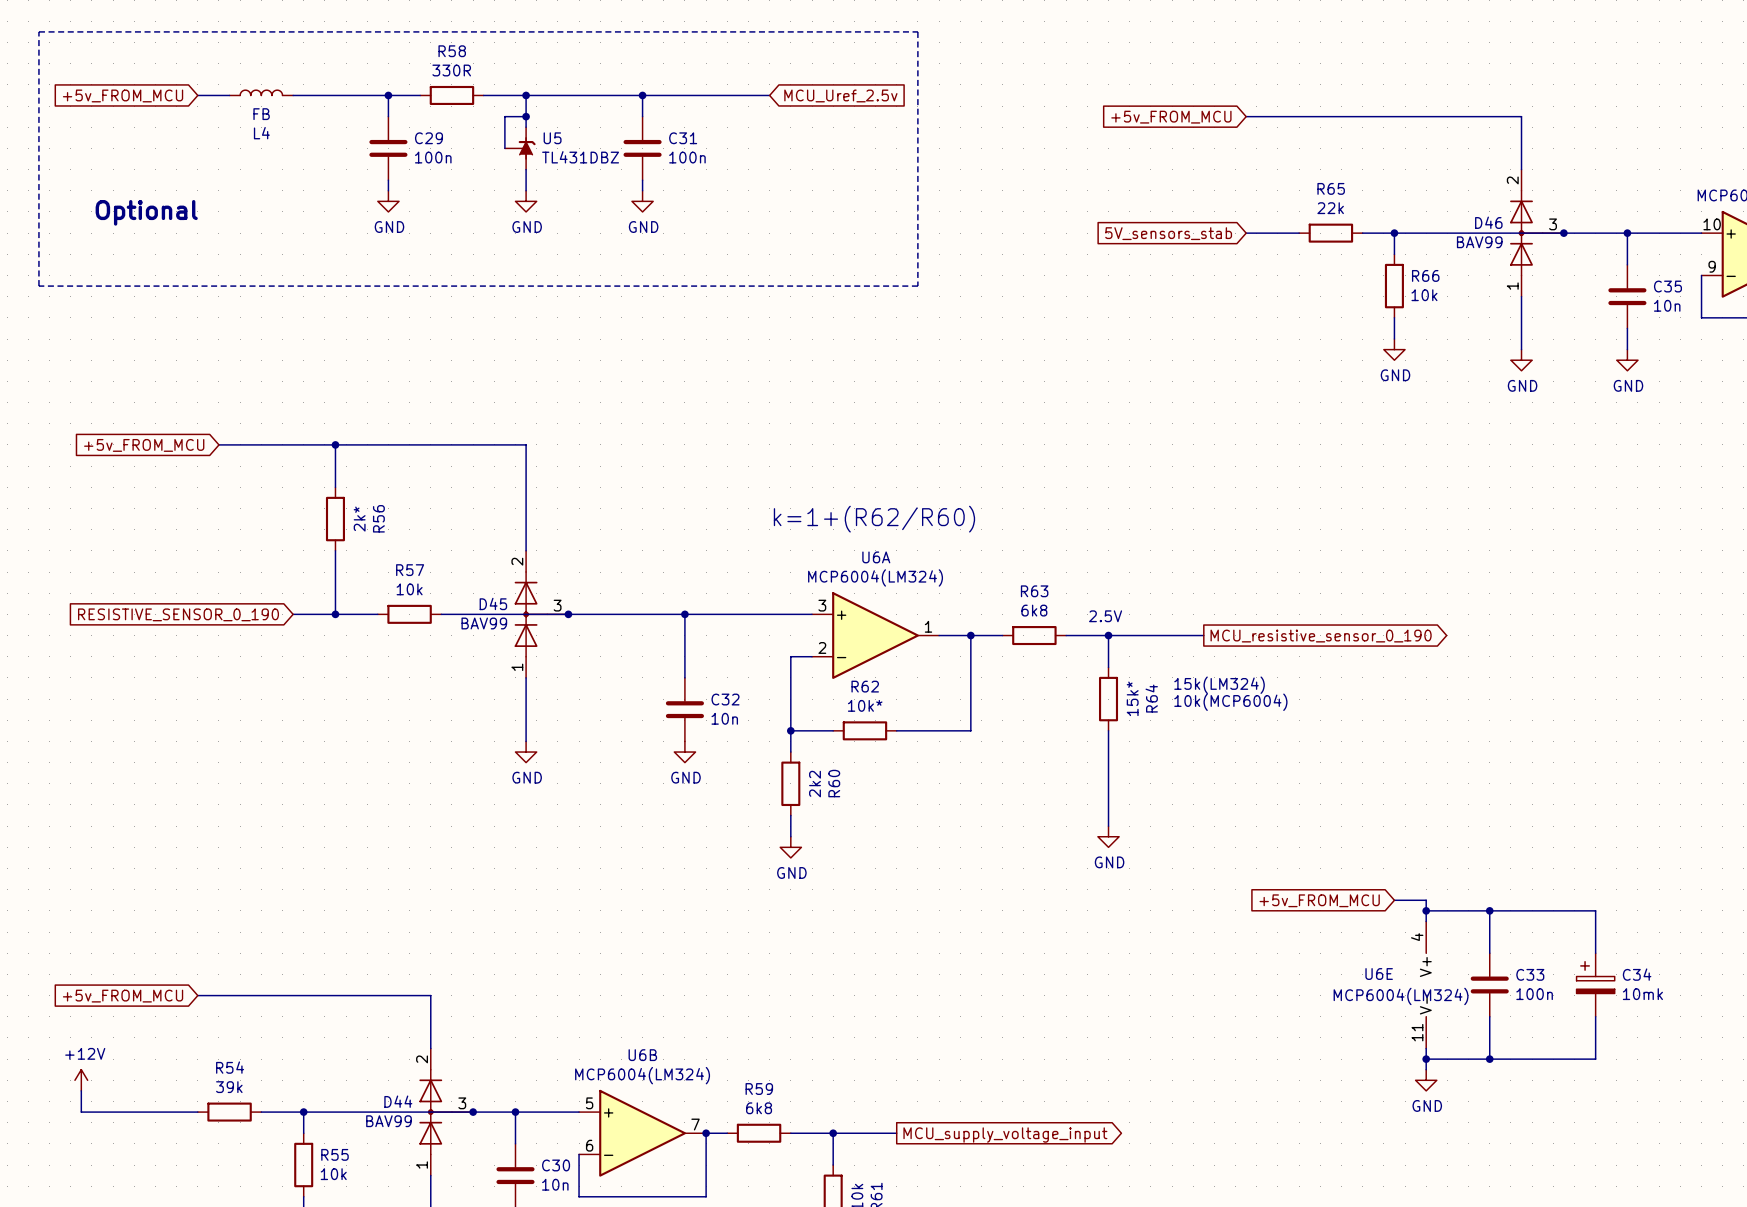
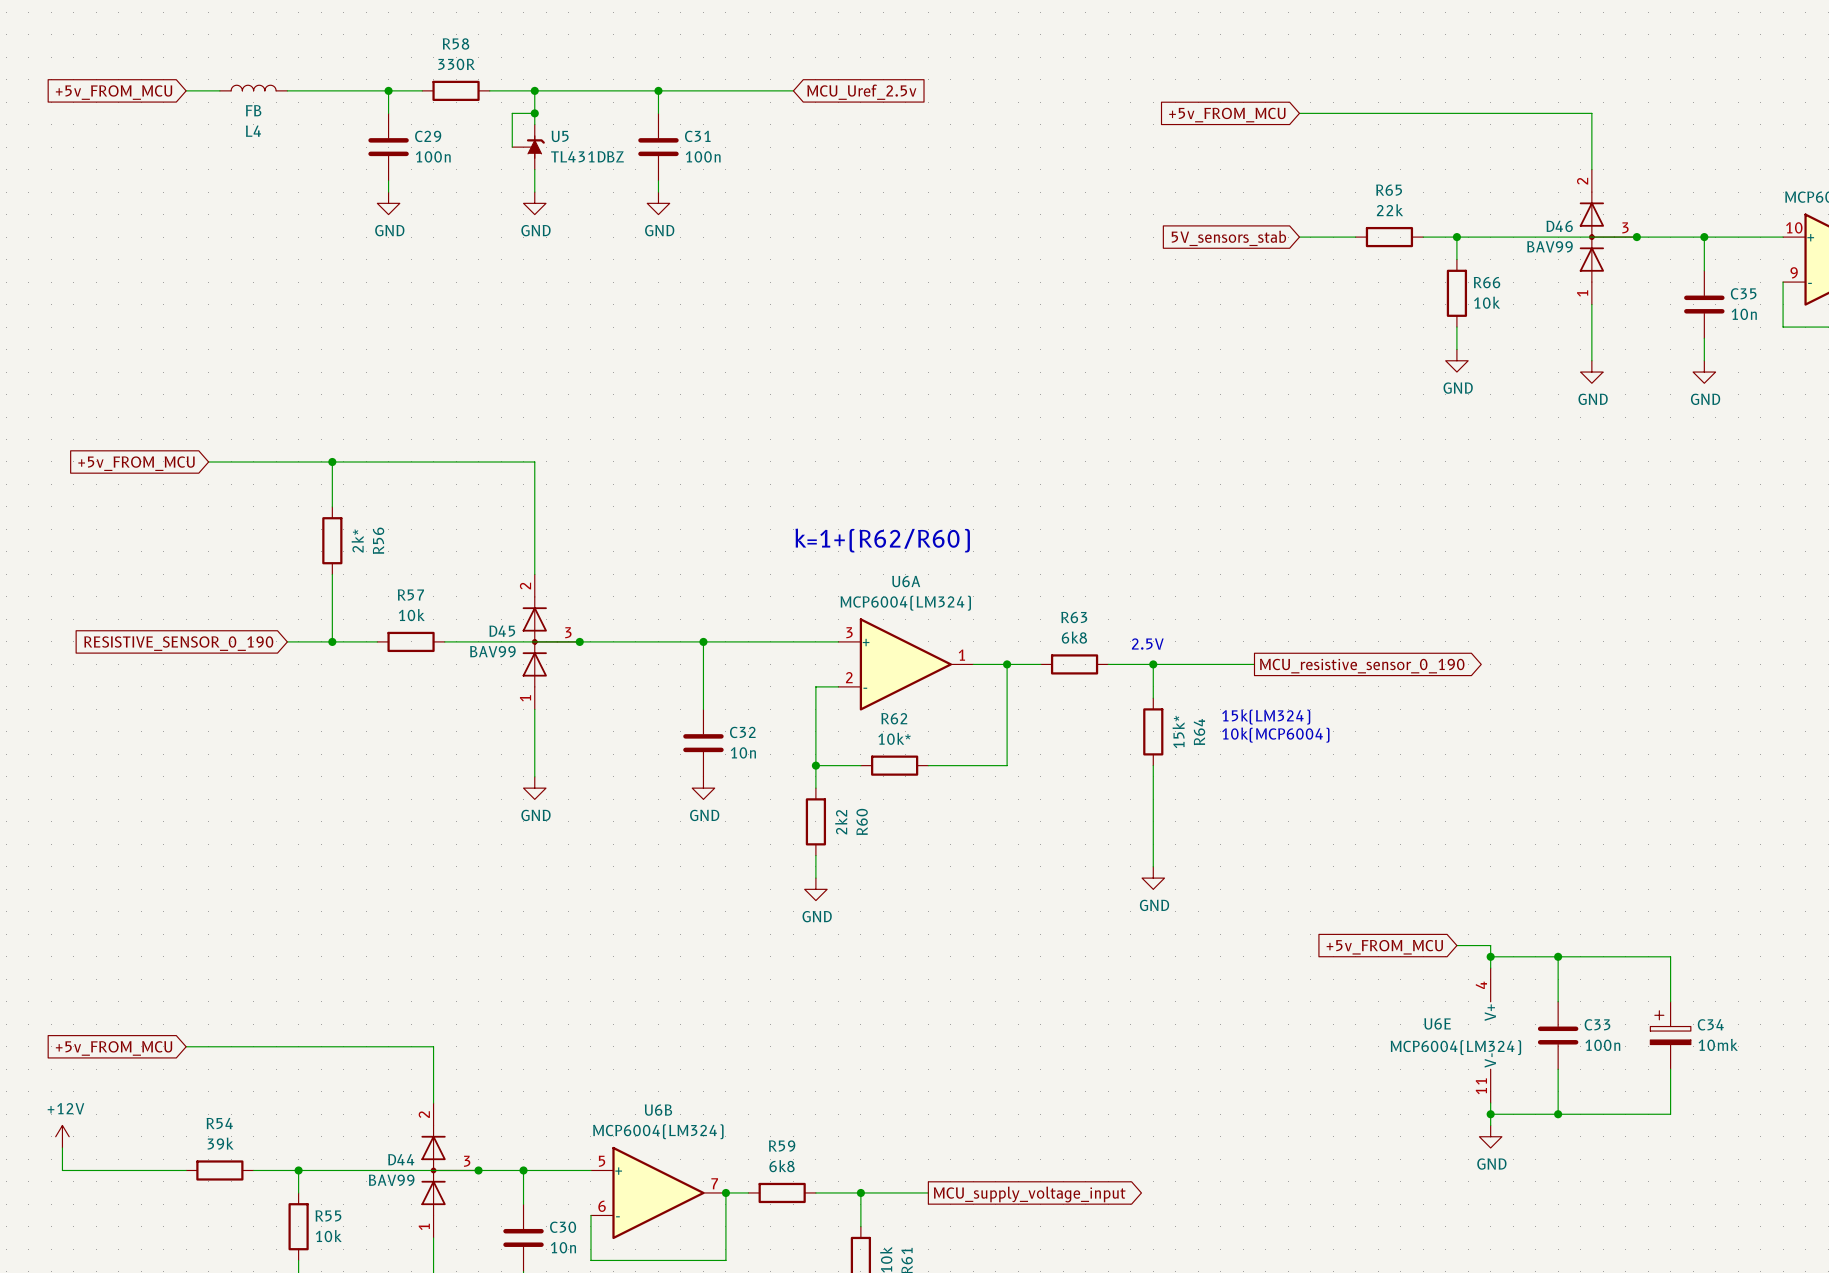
line: (38, 31) (917, 31) (917, 286) (38, 286) (38, 31) -> none
text: Optional (146, 212) -> none

